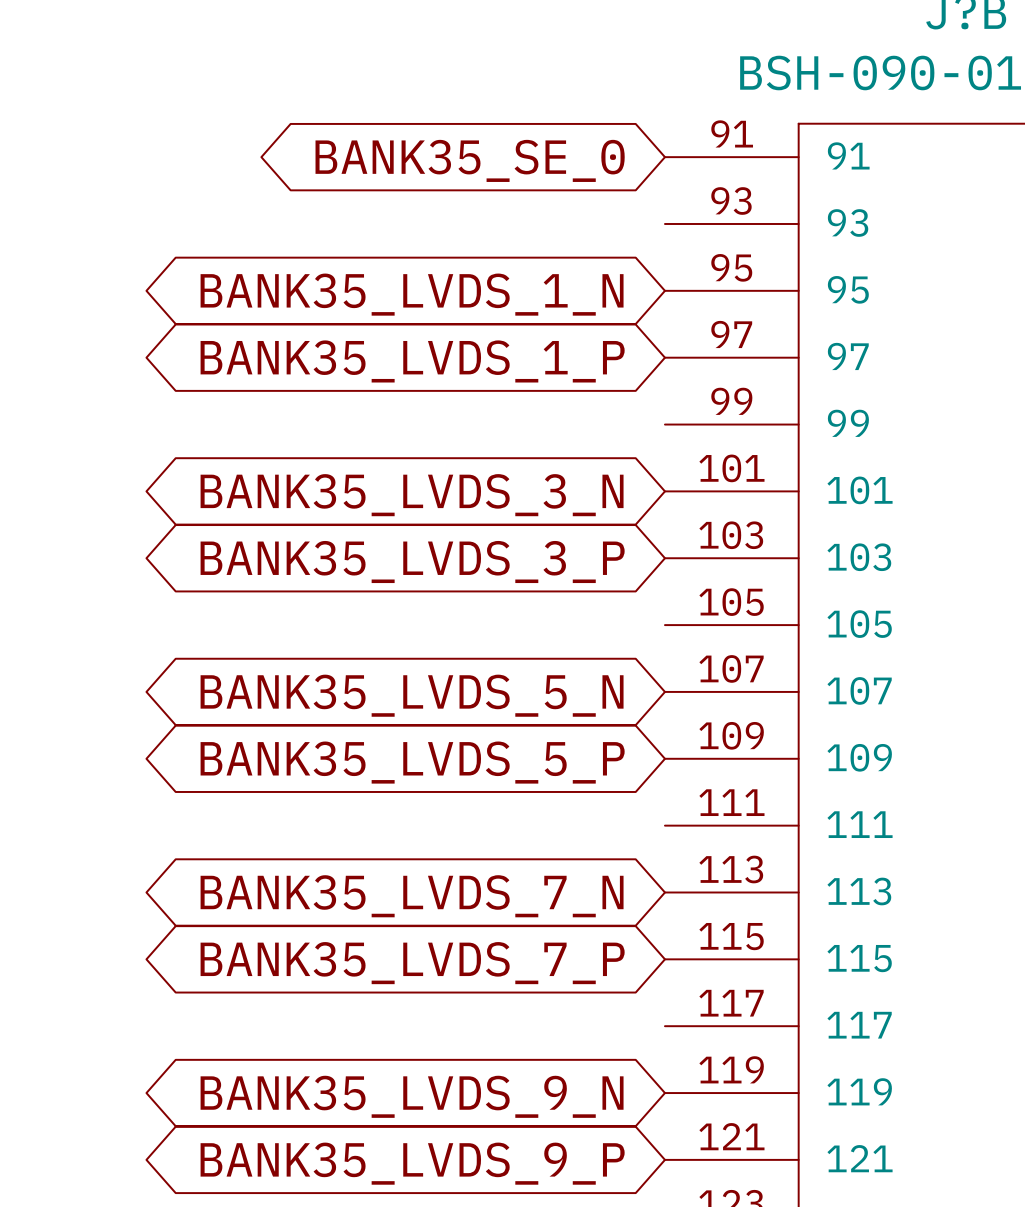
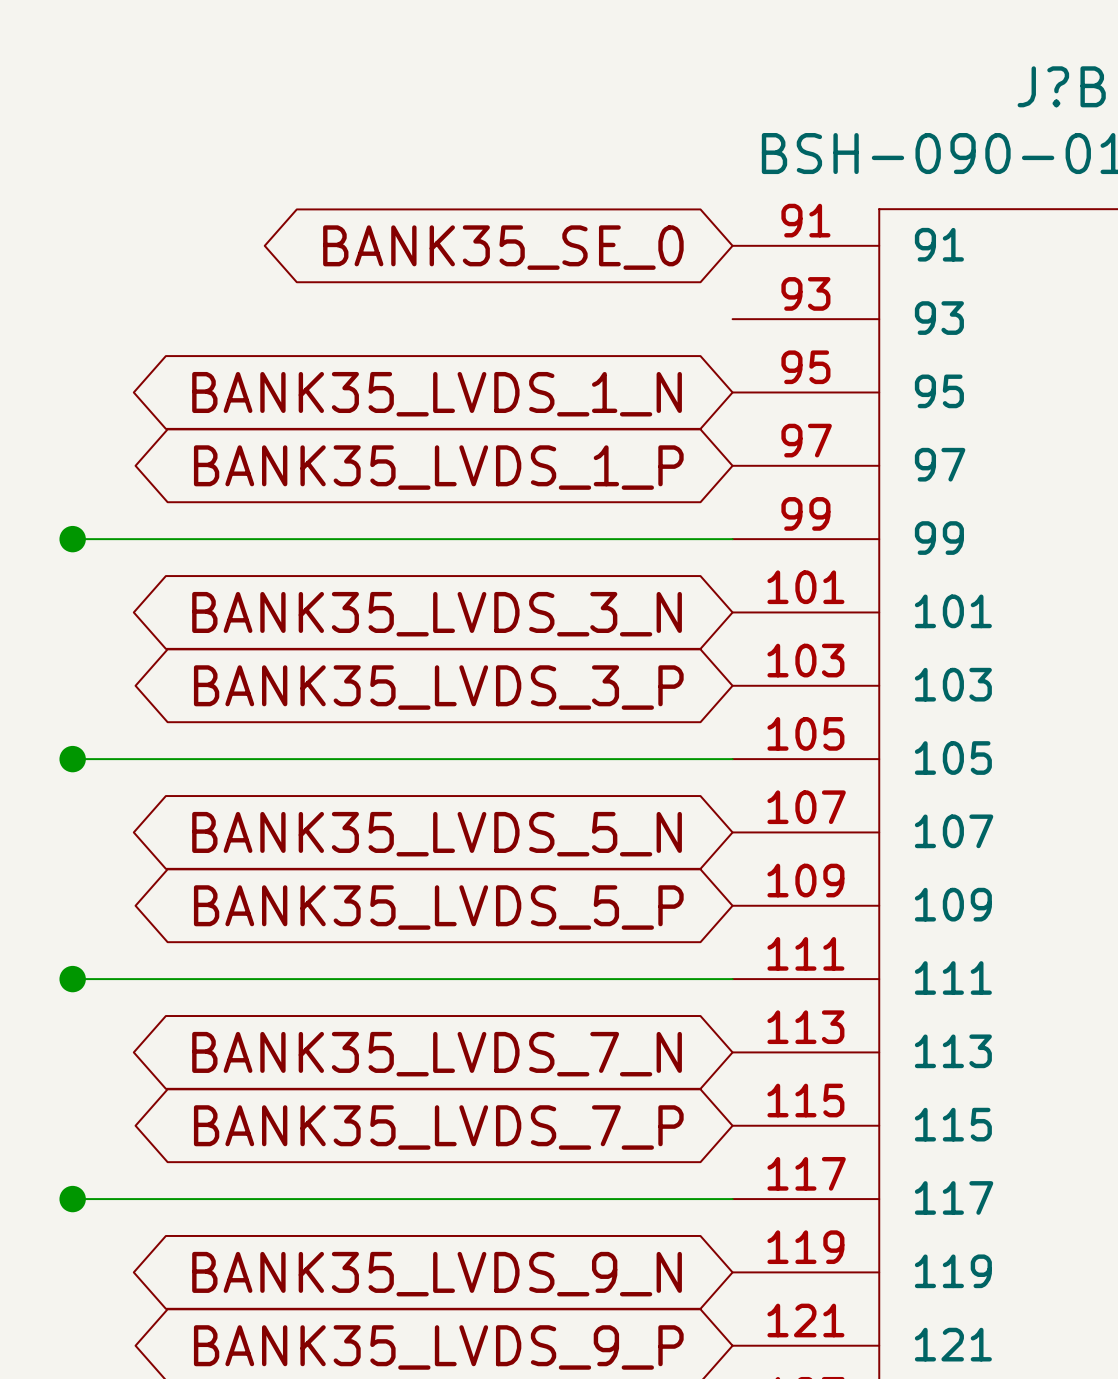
wire: none -> (72, 539) (732, 539)
junction: none -> (72, 539)
wire: none -> (72, 759) (732, 759)
junction: none -> (72, 759)
wire: none -> (72, 979) (732, 979)
junction: none -> (72, 979)
wire: none -> (72, 1199) (732, 1199)
junction: none -> (72, 1199)

